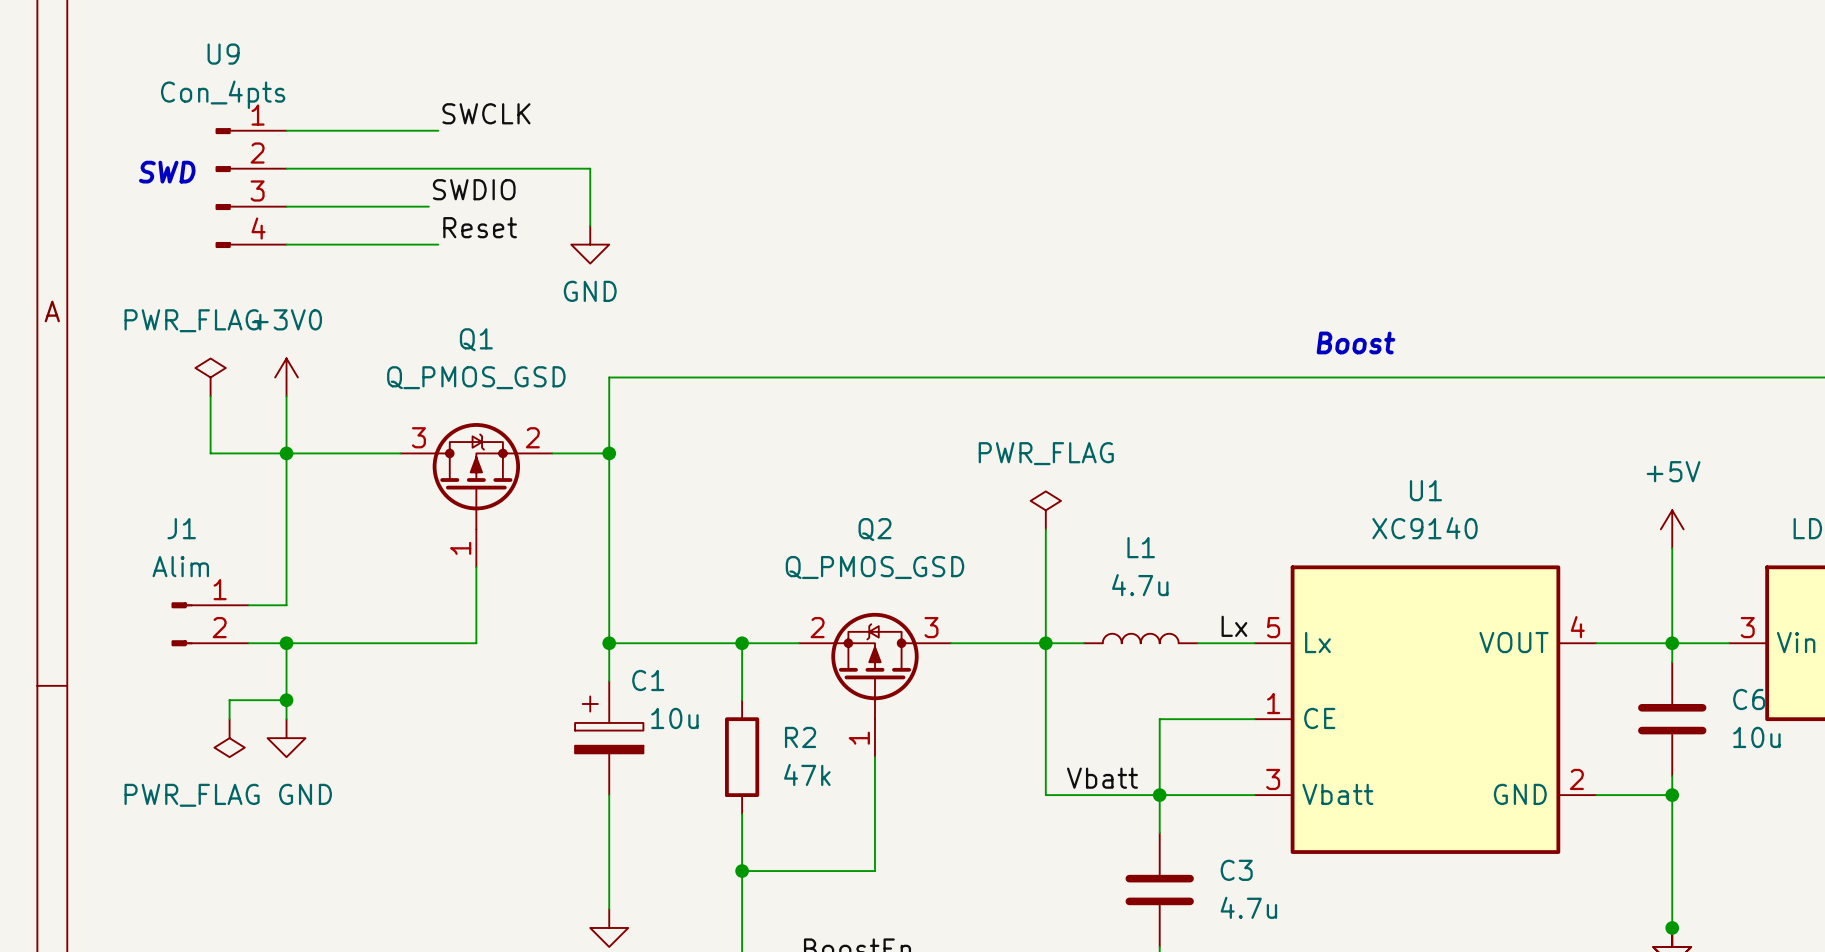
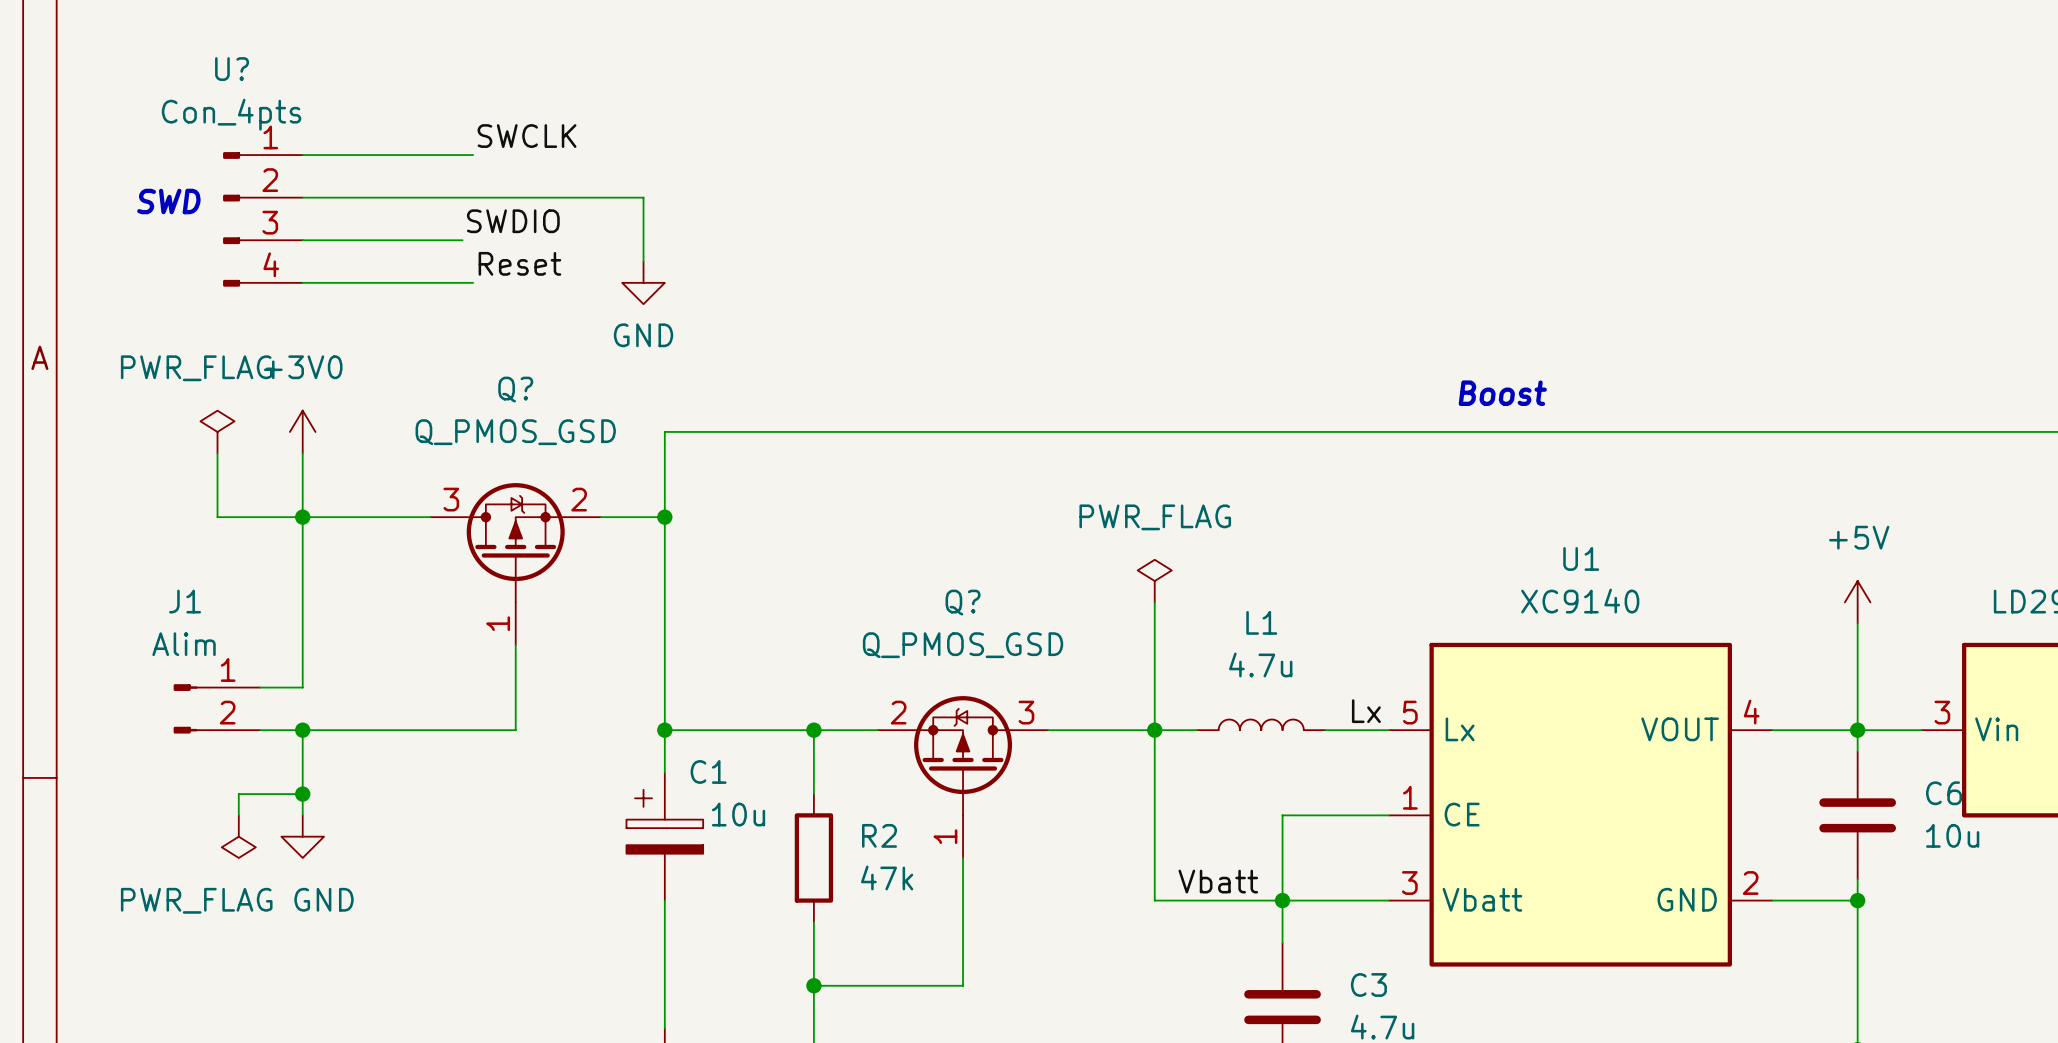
U9 name: U9 (223, 54) -> U? (232, 69)
Q1 name: Q1 (476, 339) -> Q? (515, 389)
Q2 name: Q2 (874, 529) -> Q? (963, 602)

